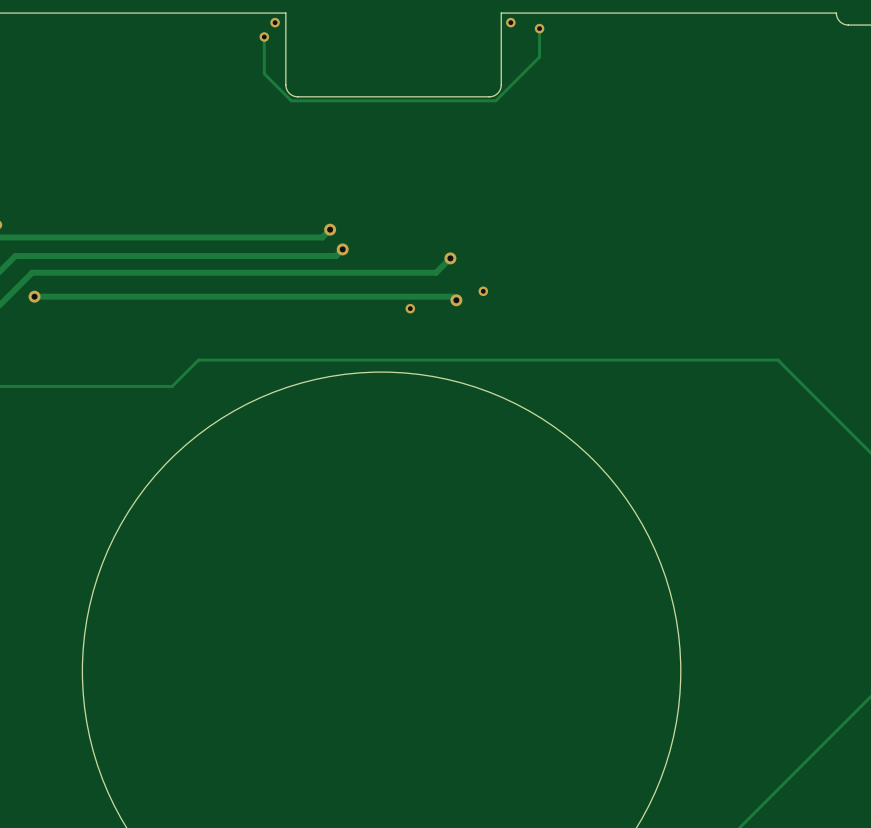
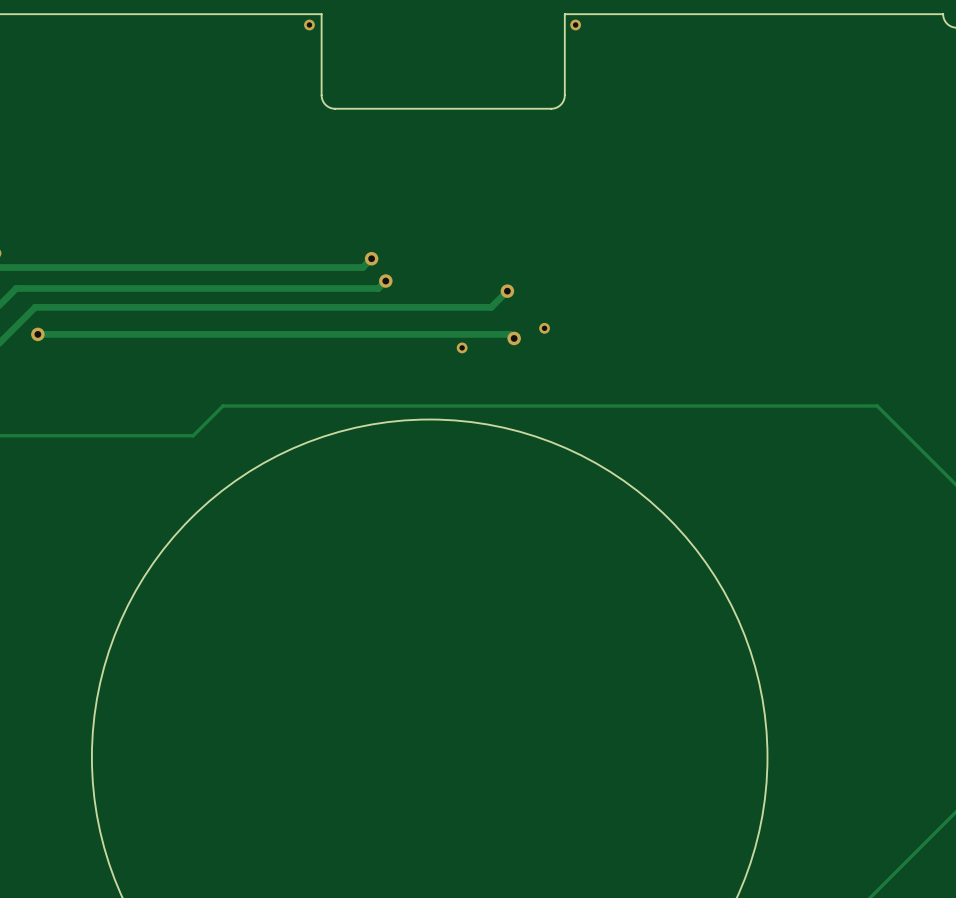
track: (539, 28) (539, 57) (495, 100) (291, 100) (264, 73) (264, 37) -> none
via: (539, 28) -> none
via: (264, 37) -> none

